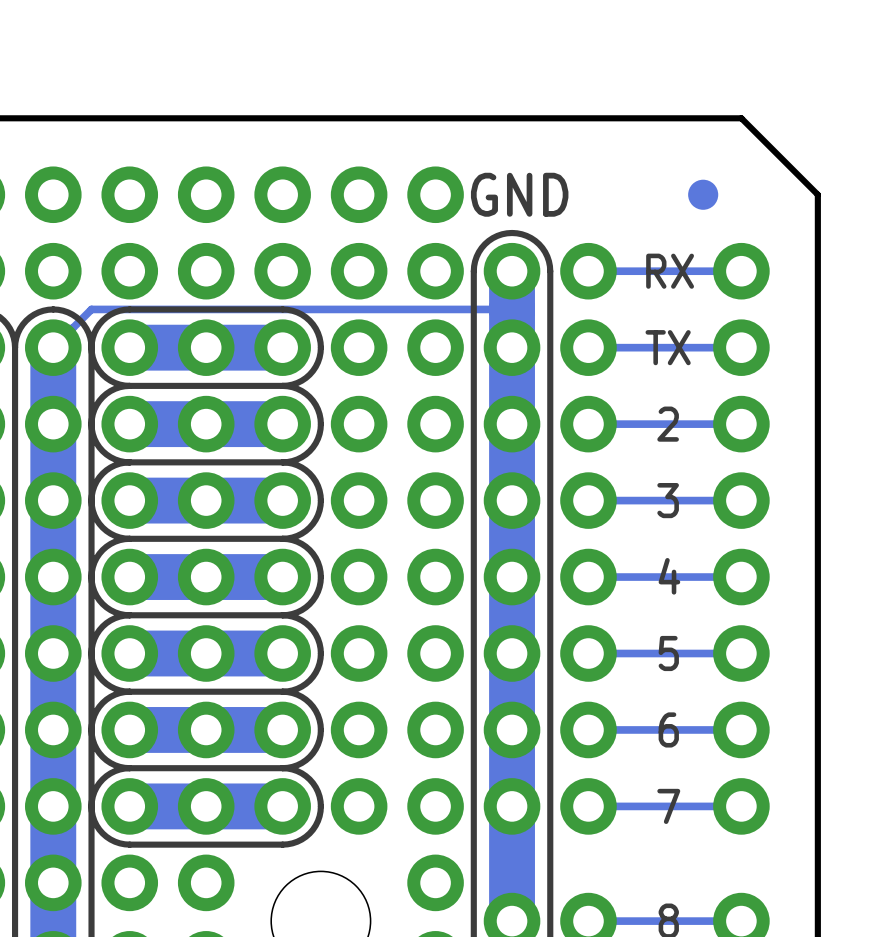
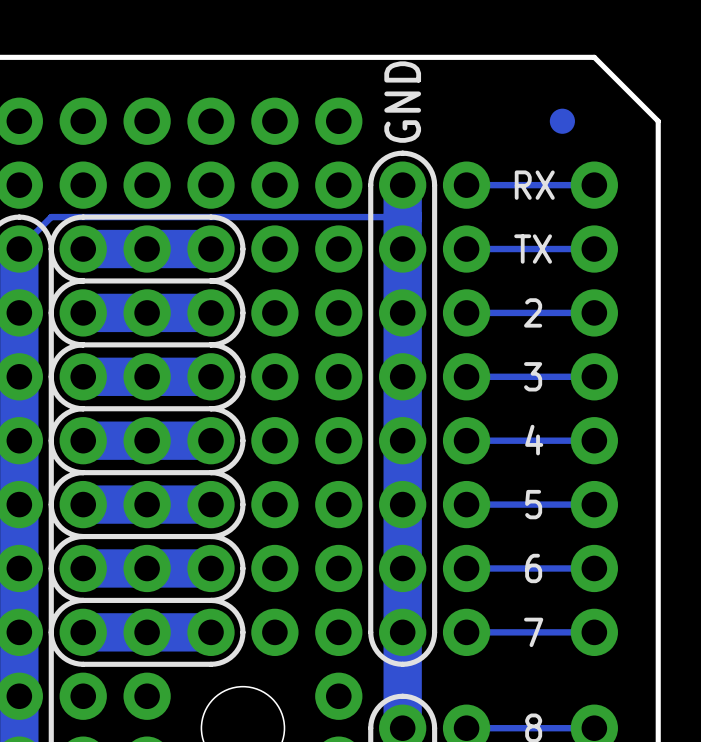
text rotation: 0° (519, 194) -> 90° counterclockwise (402, 102)
line: (473, 806) (473, 921) -> (434, 728) (432, 715) (425, 705) (414, 698) (402, 696) (390, 698) (380, 705) (373, 715) (370, 728)
line: (550, 806) (550, 921) -> (434, 632) (432, 644) (425, 654) (414, 661) (402, 664) (390, 661) (380, 654) (373, 644) (370, 632)

